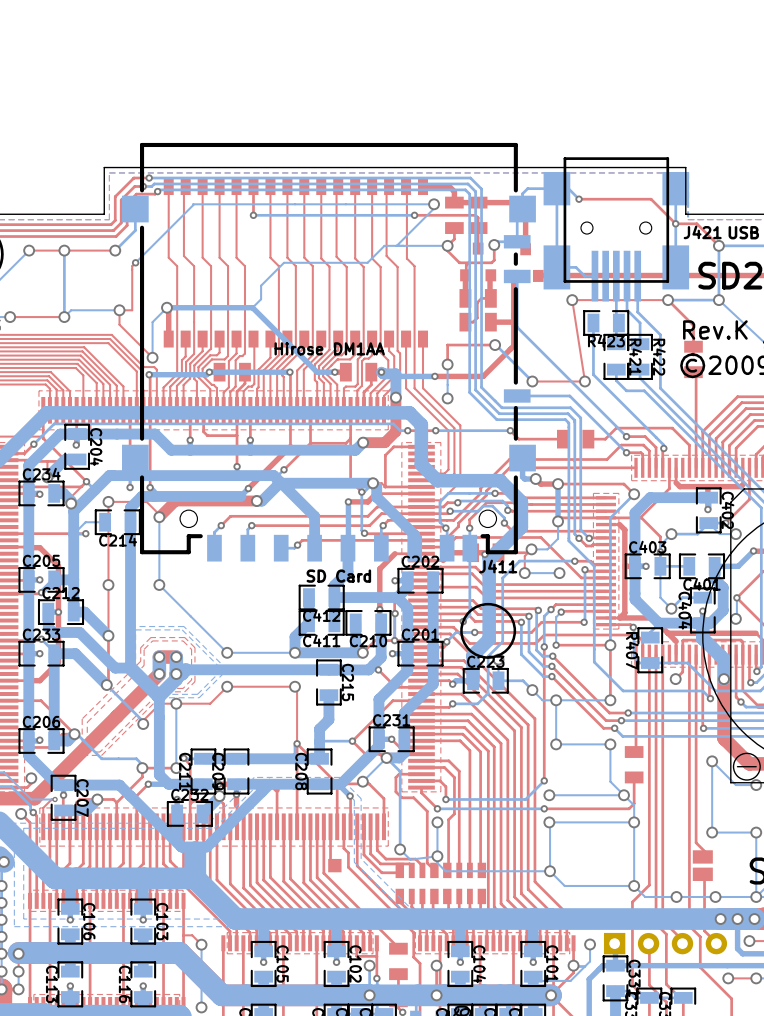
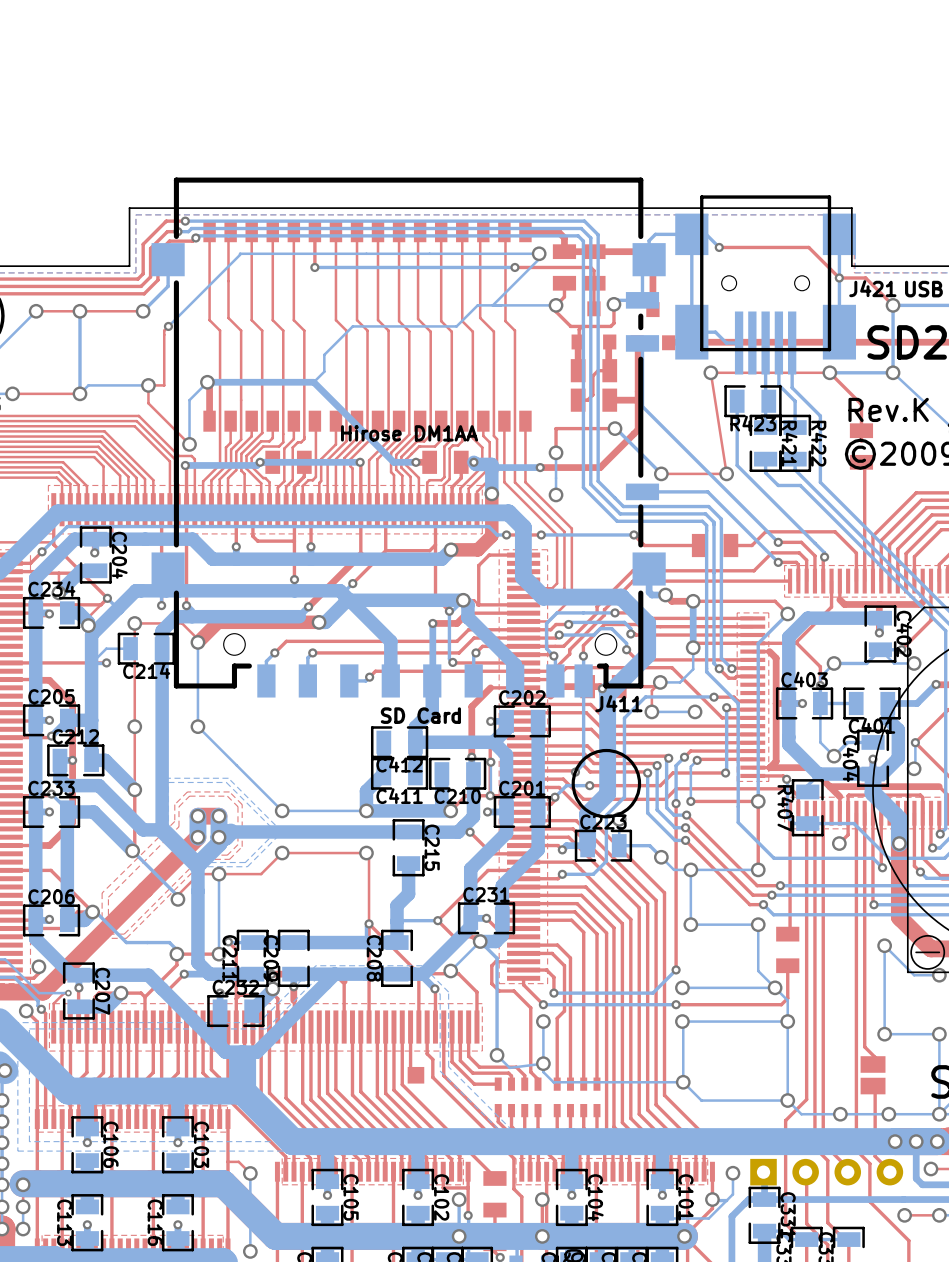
part footprint: [395, 862, 439, 905] -> [494, 1077, 542, 1118]
part footprint: [443, 862, 487, 905] -> [553, 1077, 601, 1118]

